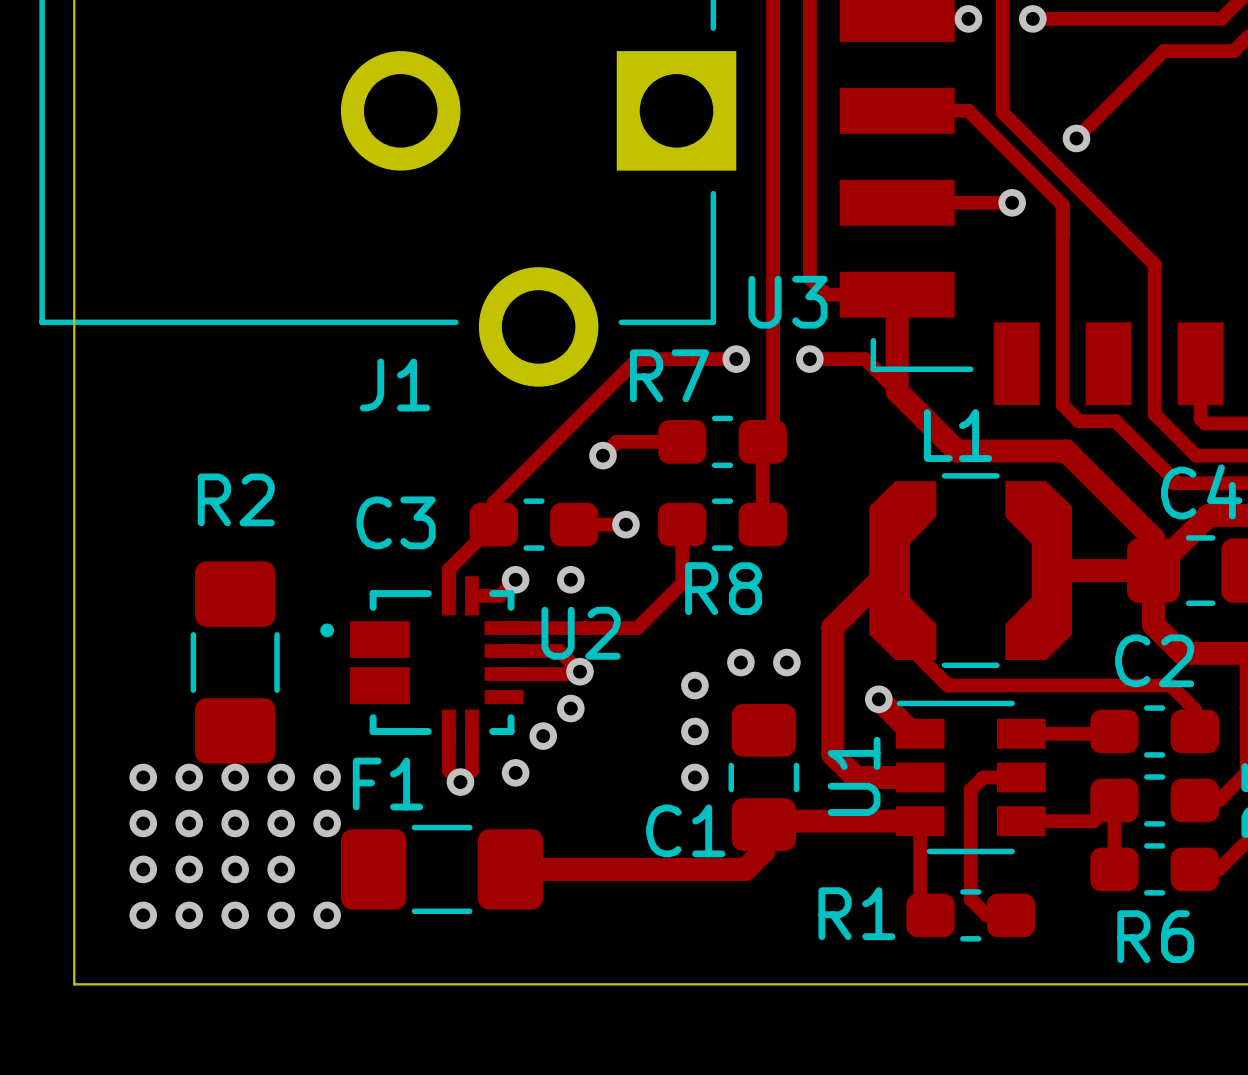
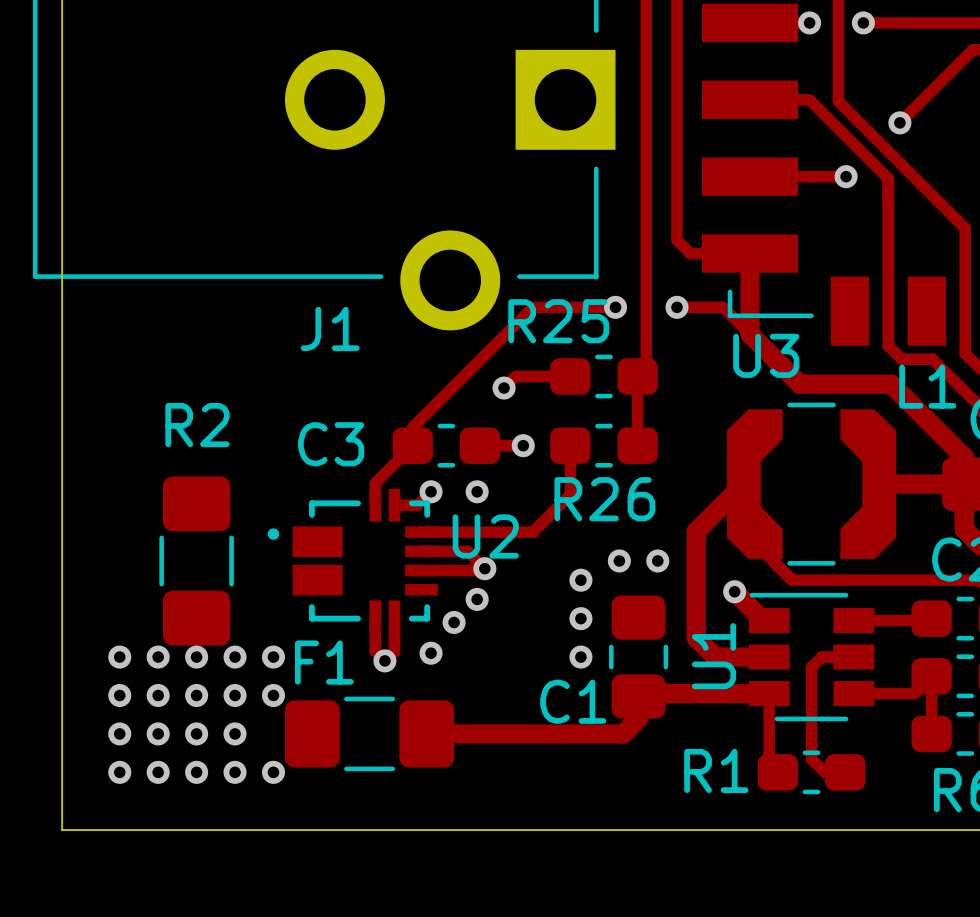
U3 name position: U3 (787, 302) -> U3 (766, 355)
R7 name: R7 (669, 375) -> R25 (558, 321)
L1 name position: L1 (958, 435) -> L1 (927, 386)
R8 name: R8 (723, 588) -> R26 (604, 499)

